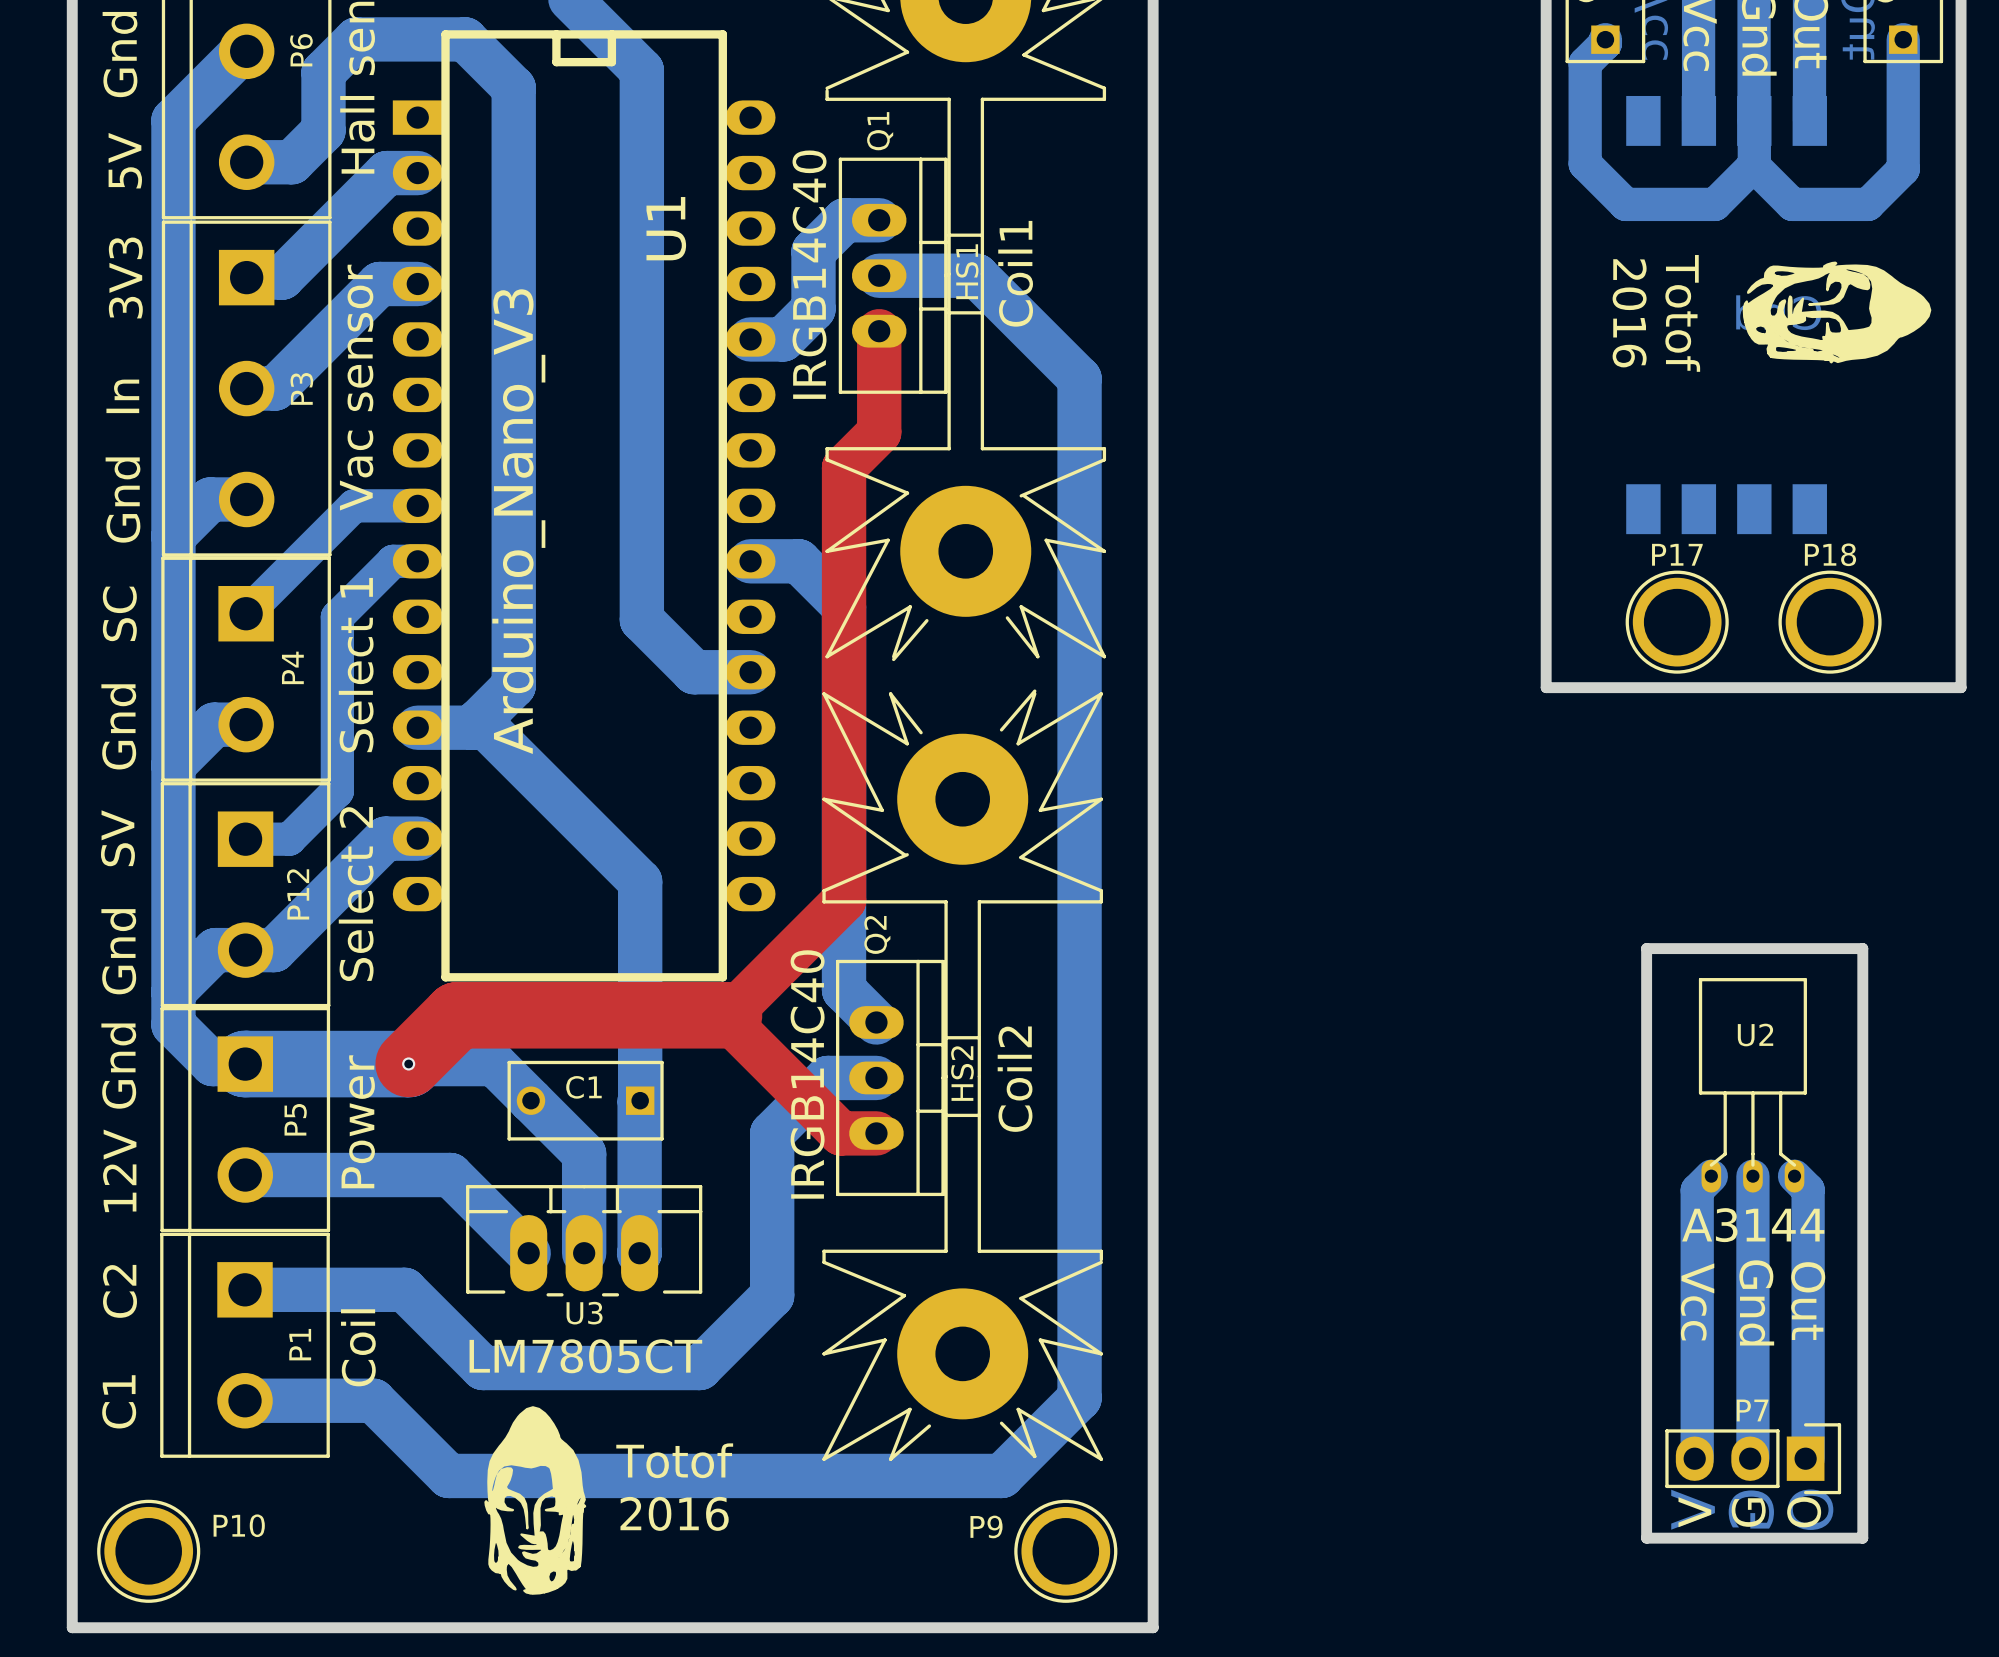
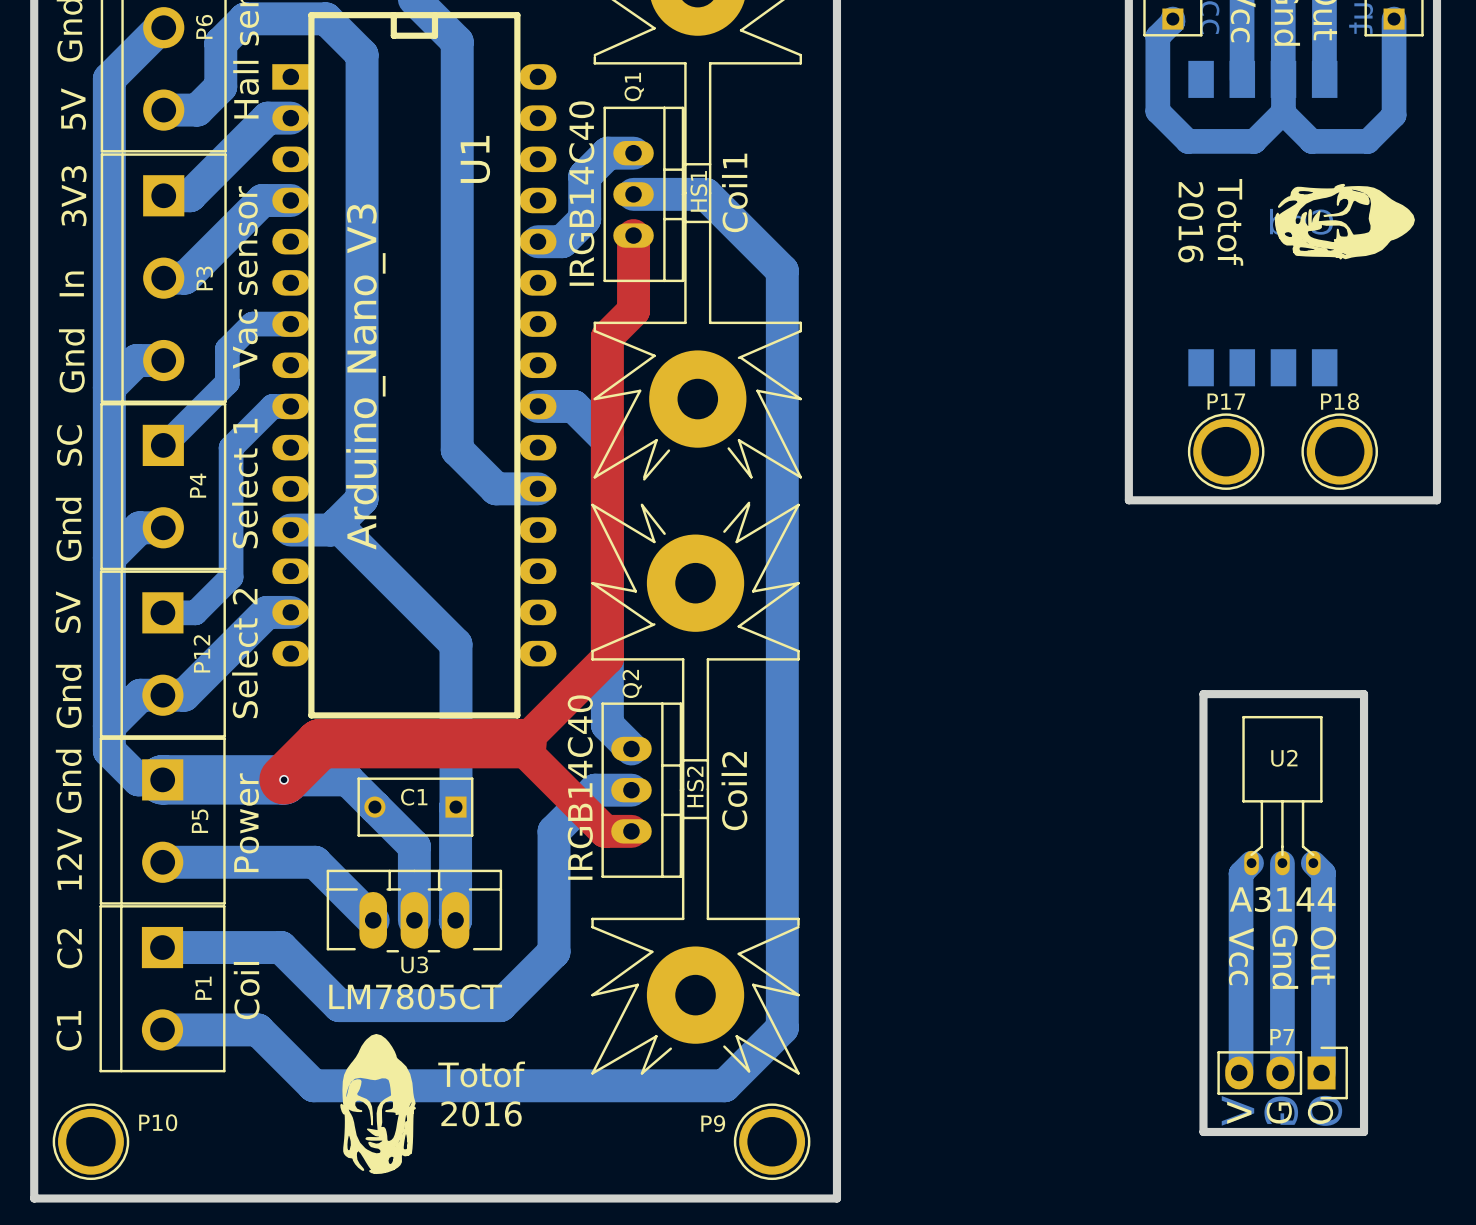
bottom track: none -> (290, 324) (252, 324) (227, 349) (227, 382) (164, 445)
bottom track: (417, 505) (353, 505) (246, 613) -> none

